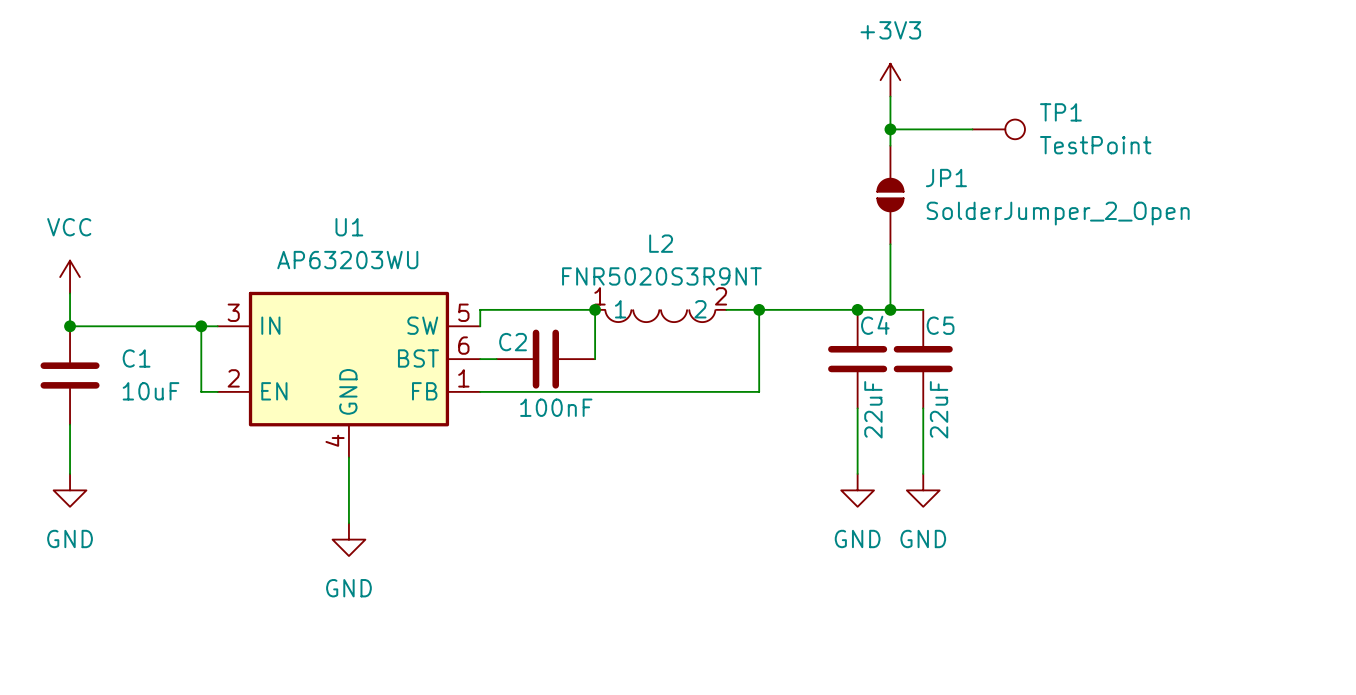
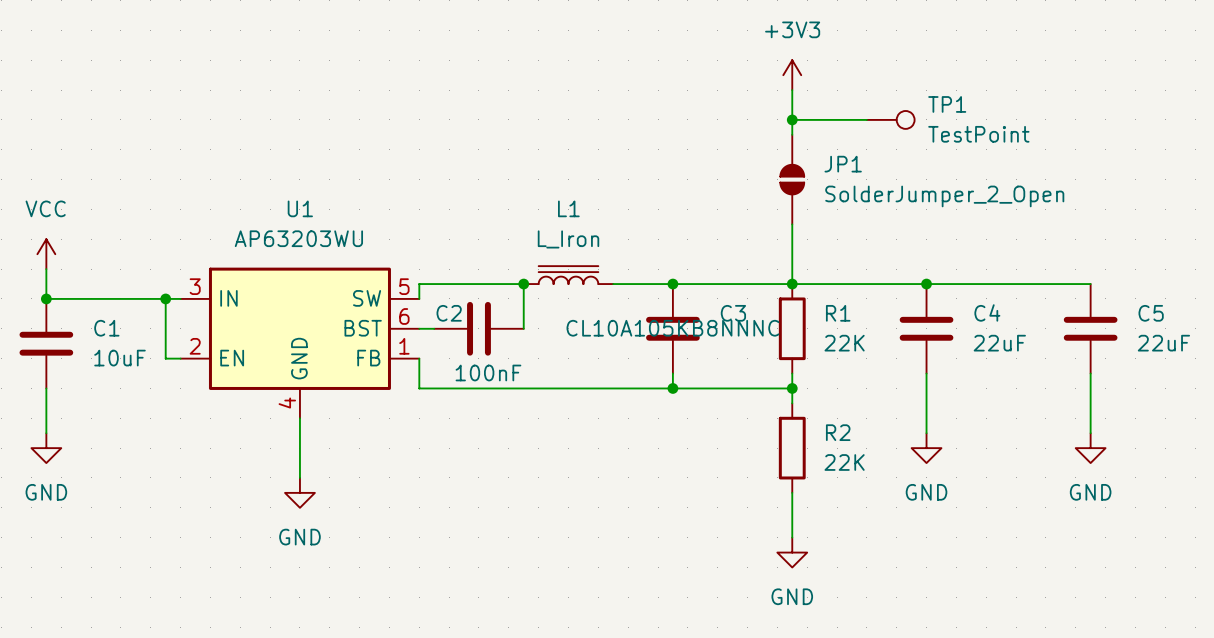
L1: none -> L_Iron (568, 275)
wire: none -> (613, 284) (643, 284)
wire: (759, 309) (759, 391) (480, 391) -> (792, 388) (419, 388) (419, 358)
junction: (857, 309) -> none
wire: none -> (822, 284) (1090, 284)
junction: none -> (926, 284)
L2: FNR5020S3R9NT (660, 316) -> none
C4 name position: C4 (875, 325) -> C4 (987, 312)
C5 name position: C5 (940, 325) -> C5 (1151, 313)
C3: none -> (672, 328)
C4 position: (857, 359) -> (926, 328)
R1: none -> 22K (792, 328)
C5 position: (923, 359) -> (1090, 328)
wire: none -> (672, 373) (672, 388)
wire: (857, 408) (857, 473) -> none
wire: none -> (792, 373) (792, 403)
wire: (923, 408) (923, 473) -> (926, 373) (926, 433)
wire: none -> (1090, 373) (1090, 433)
C4 value rotation: 0° (873, 409) -> 90° clockwise (999, 343)
C4 value position: 22uF (873, 409) -> 22uF (999, 343)
C5 value rotation: 0° (939, 409) -> 90° clockwise (1163, 343)
C5 value position: 22uF (939, 409) -> 22uF (1163, 343)
junction: none -> (672, 388)
junction: none -> (792, 388)
power symbol: GND (857, 490) -> none
R2: none -> 22K (792, 448)
power symbol: GND (923, 490) -> none
power symbol: none -> GND (926, 448)
power symbol: none -> GND (1090, 448)
wire: none -> (792, 492) (792, 537)
power symbol: none -> GND (792, 552)

